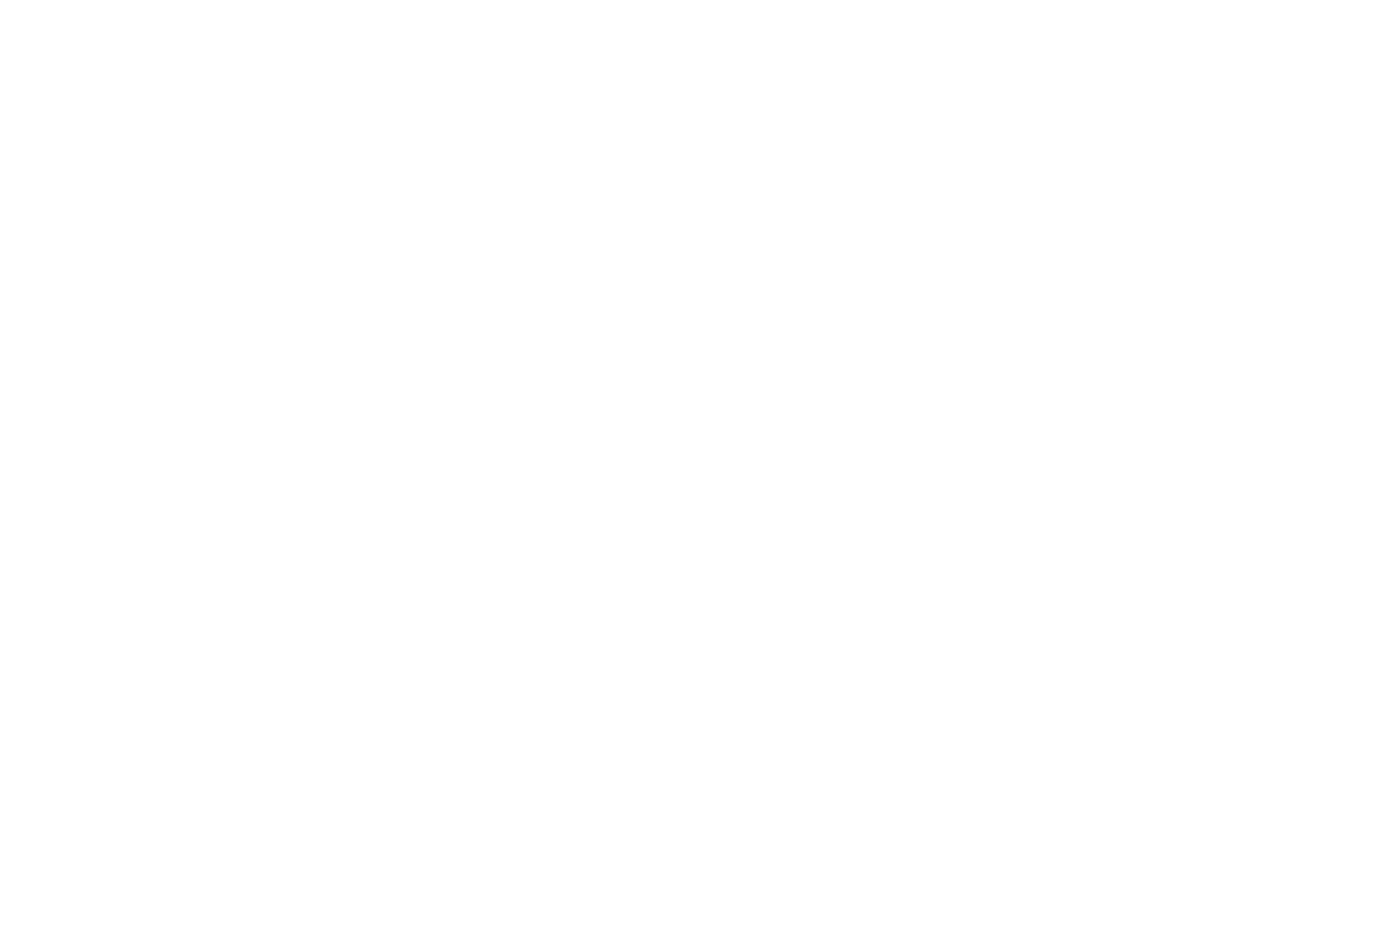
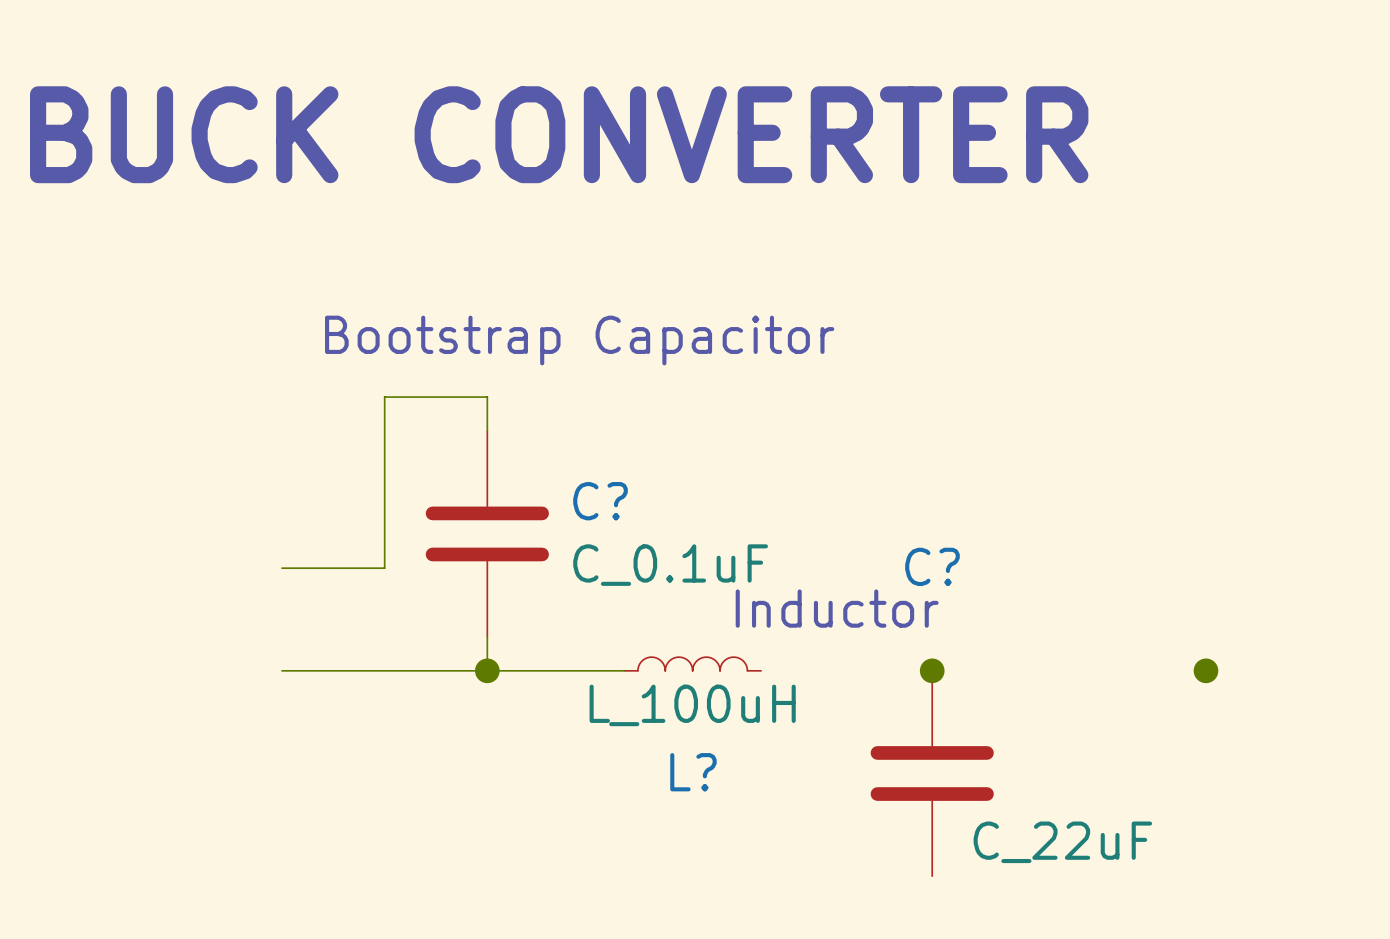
text: none -> BUCK CONVERTER (559, 134)
text: none -> Bootstrap Capacitor (579, 340)
wire: none -> (487, 431) (487, 397) (384, 397) (384, 568) (282, 568)
C?: none -> C_0.1uF (487, 533)
text: none -> Inductor (837, 608)
wire: none -> (487, 636) (487, 670)
L?: none -> L_100uH (692, 663)
wire: none -> (282, 670) (624, 670)
junction: none -> (487, 670)
junction: none -> (932, 670)
junction: none -> (1205, 670)
C?: none -> C_22uF (932, 773)

